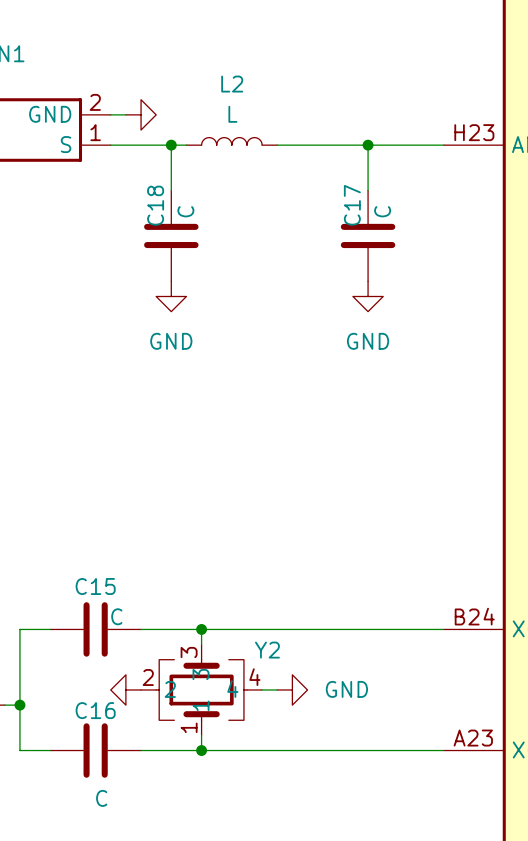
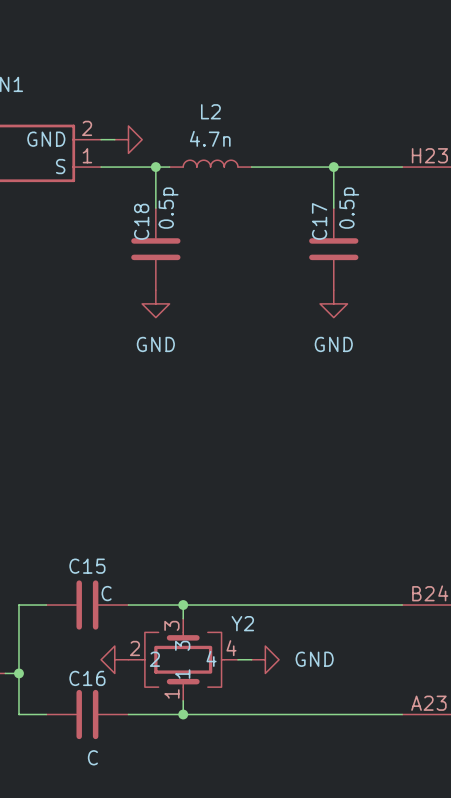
L2 value: L (232, 114) -> 4.7n (210, 138)
C18 value: C (185, 211) -> 0.5p (168, 208)
C17 value: C (382, 211) -> 0.5p (349, 208)

